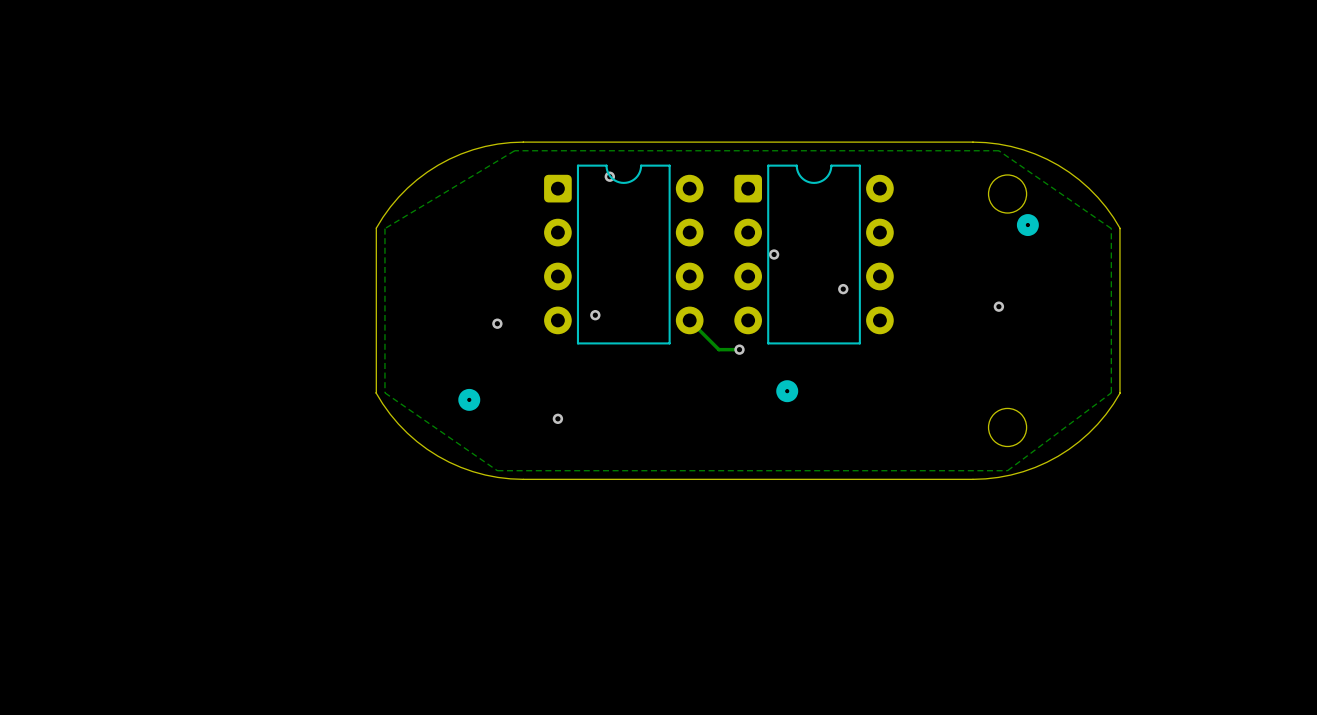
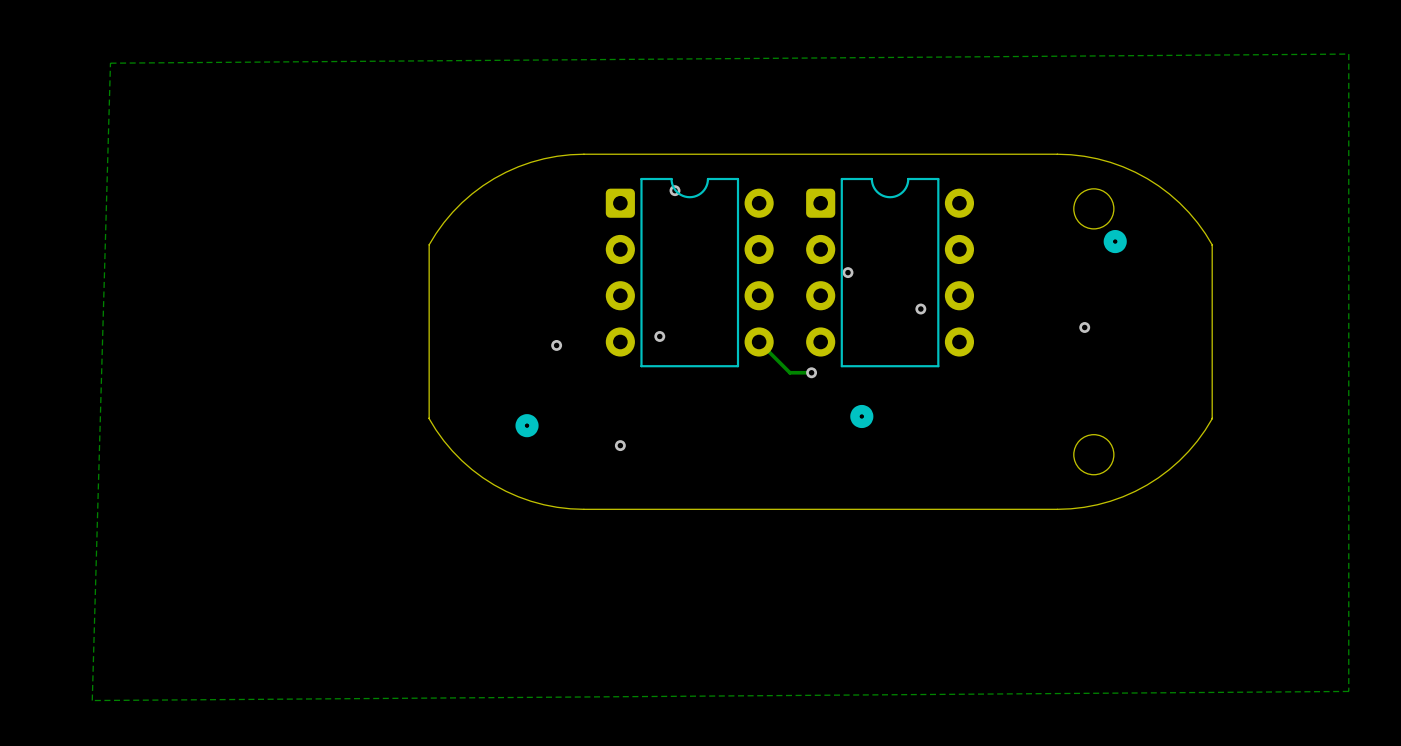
zone outline: none -> (1348, 54) (1348, 691) (92, 700) (110, 63) (1348, 54)
zone outline: (998, 150) (1111, 228) (1111, 392) (1007, 470) (497, 470) (384, 392) (384, 228) (514, 150) (998, 150) -> none

